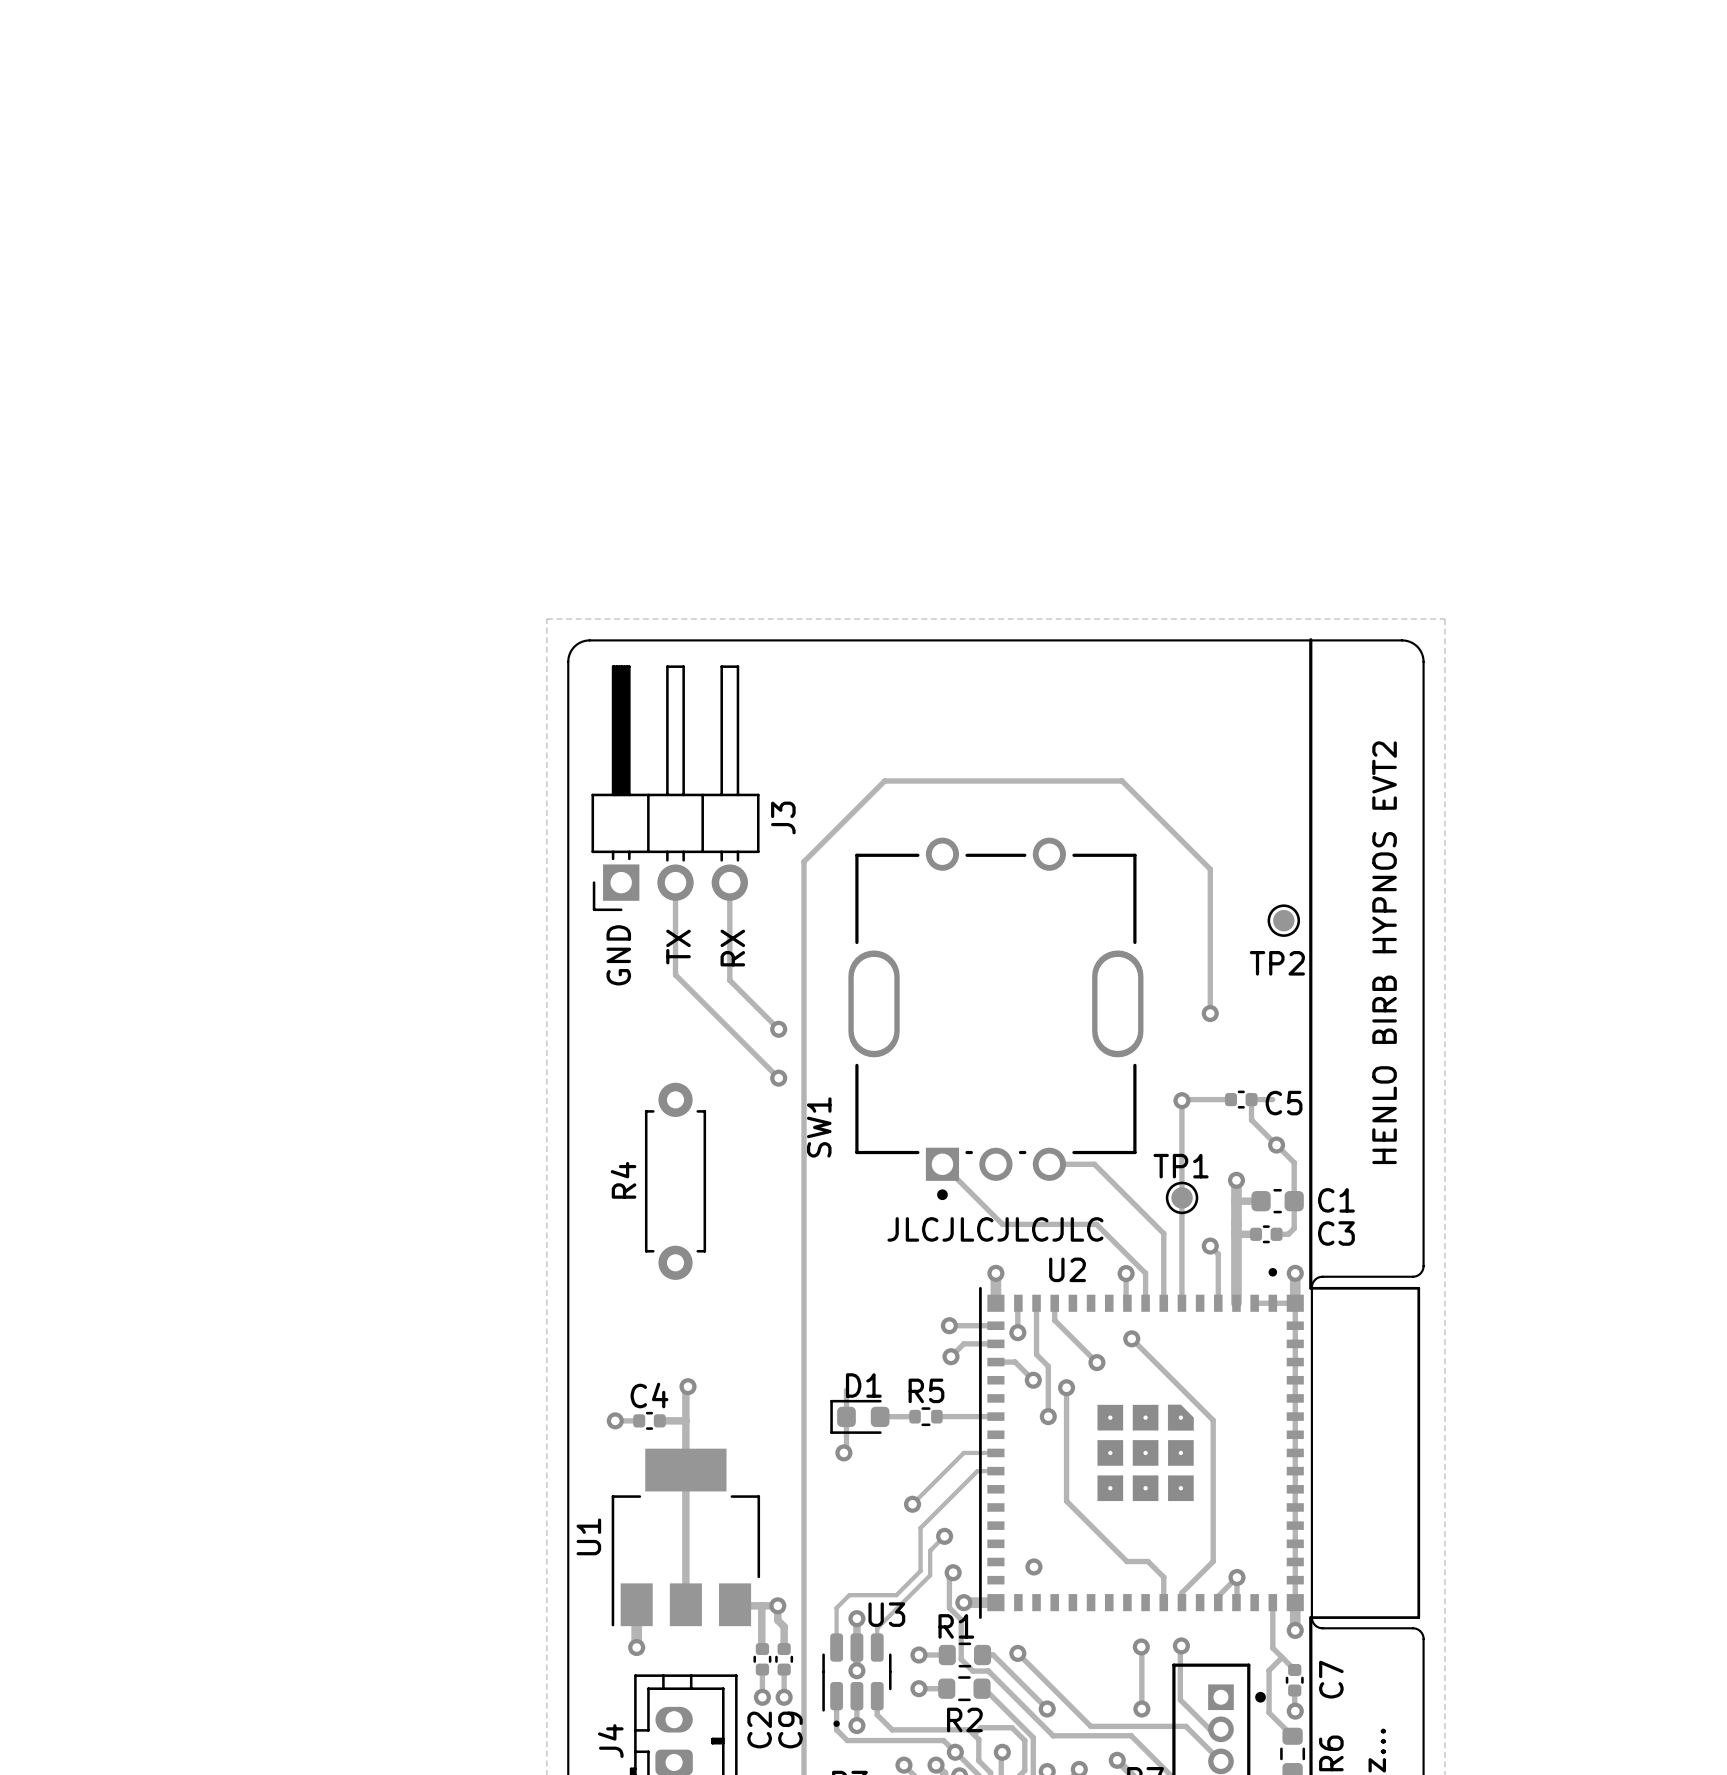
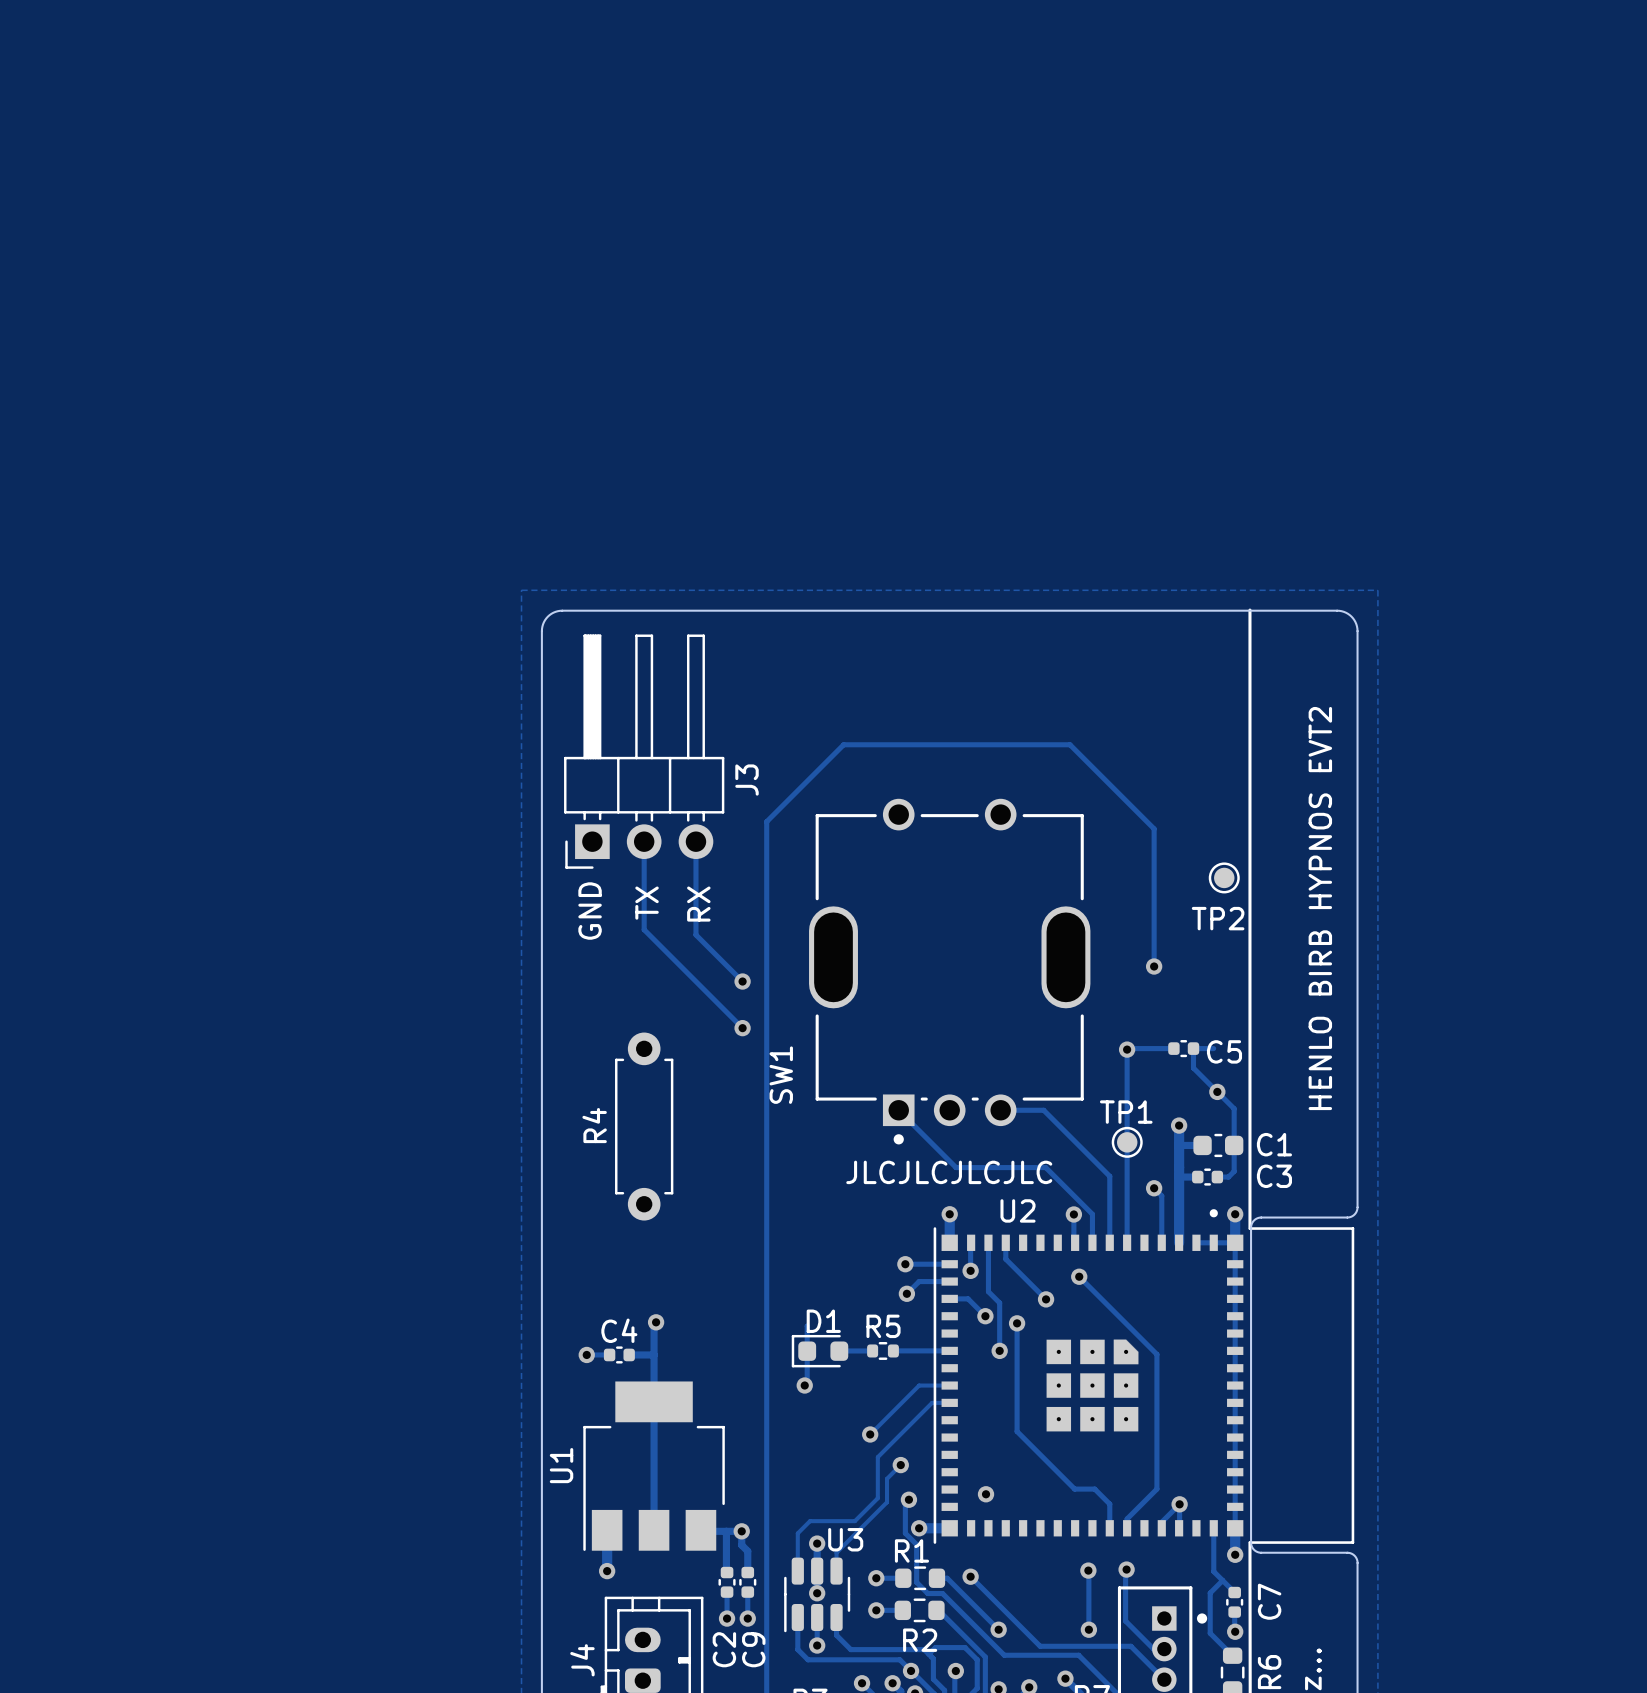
drawing: [833, 1720, 840, 1727] -> none

